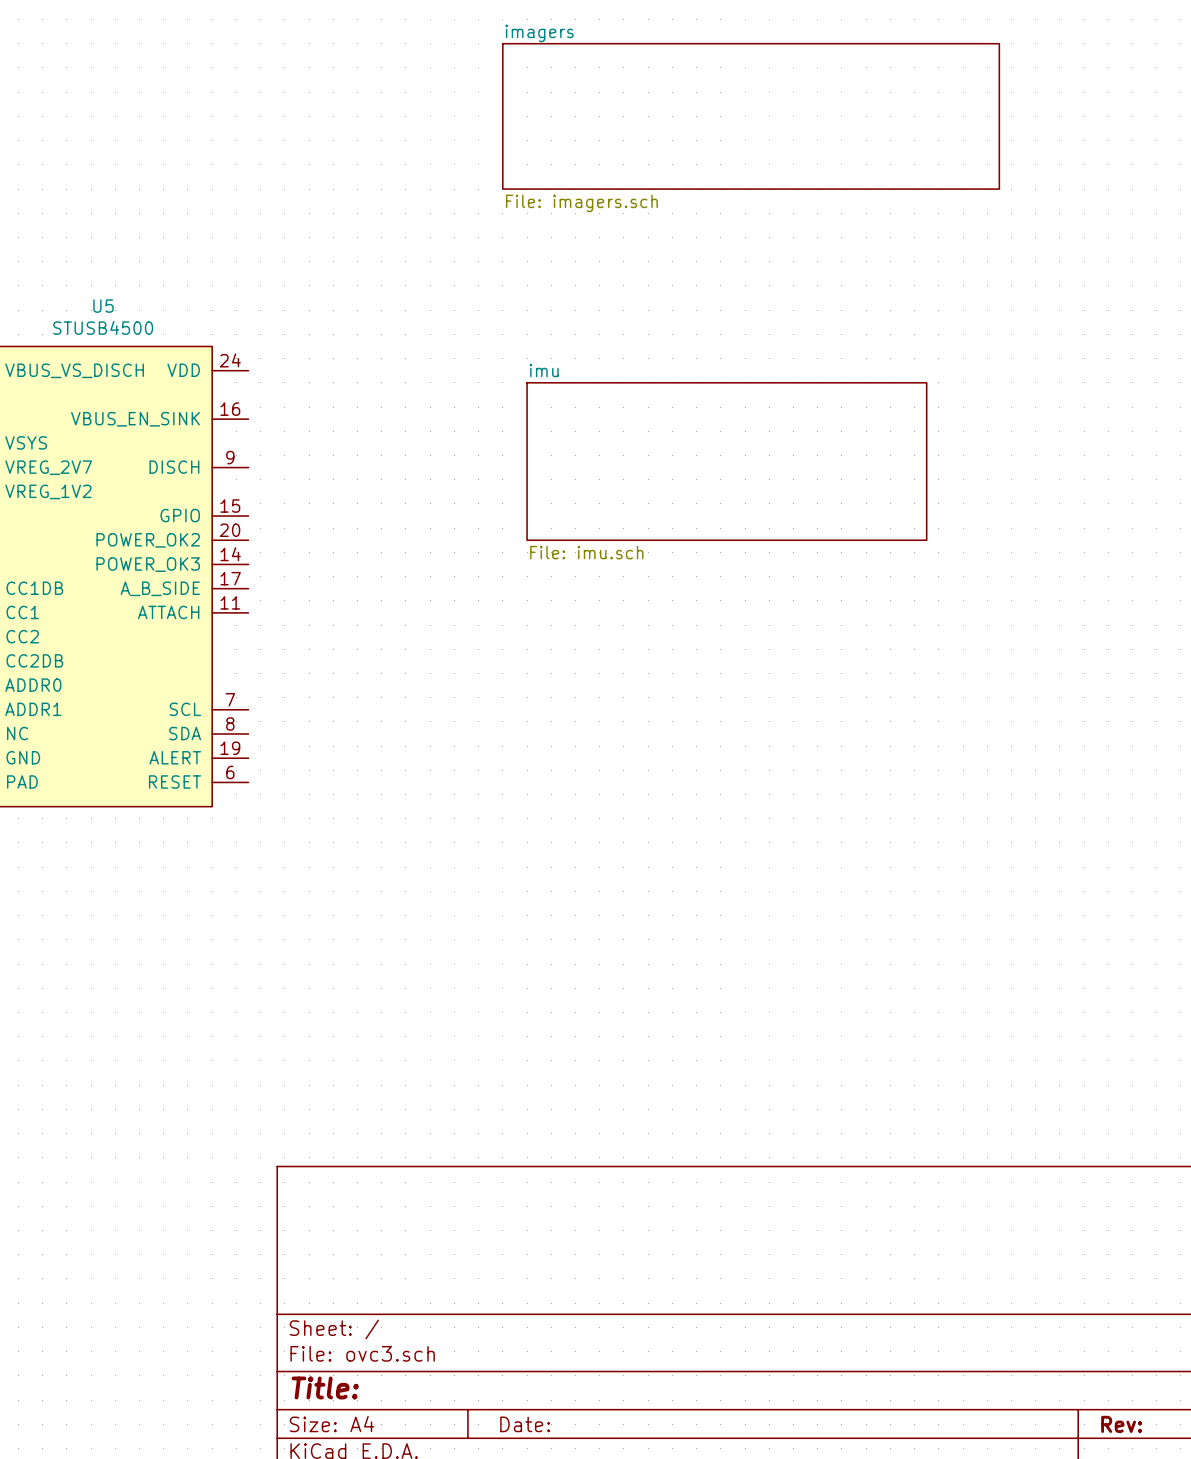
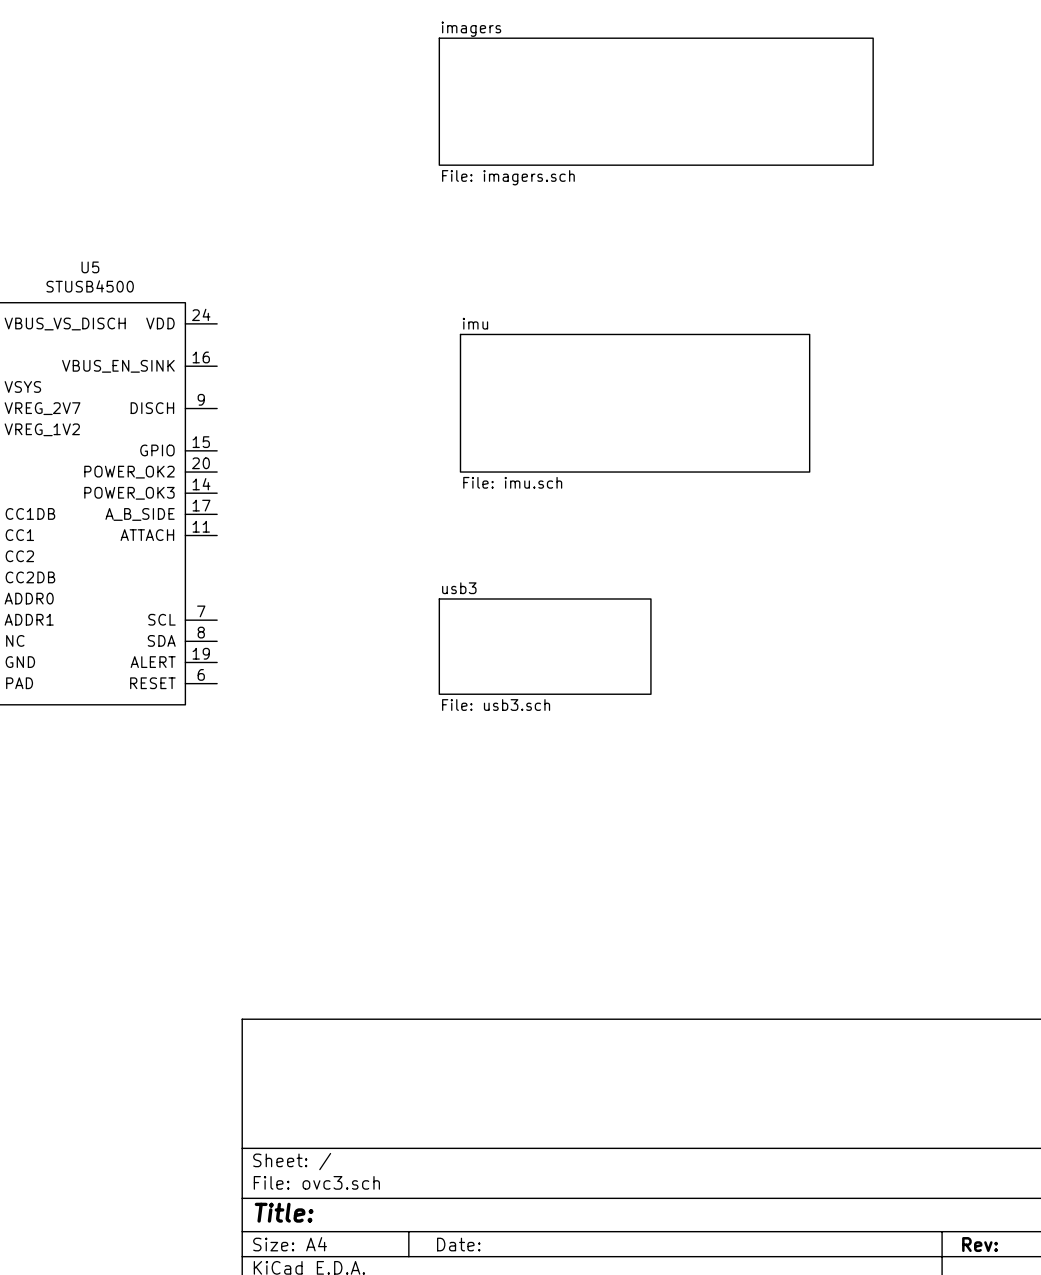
sheet usb3: none -> File: usb3.sch (545, 646)

